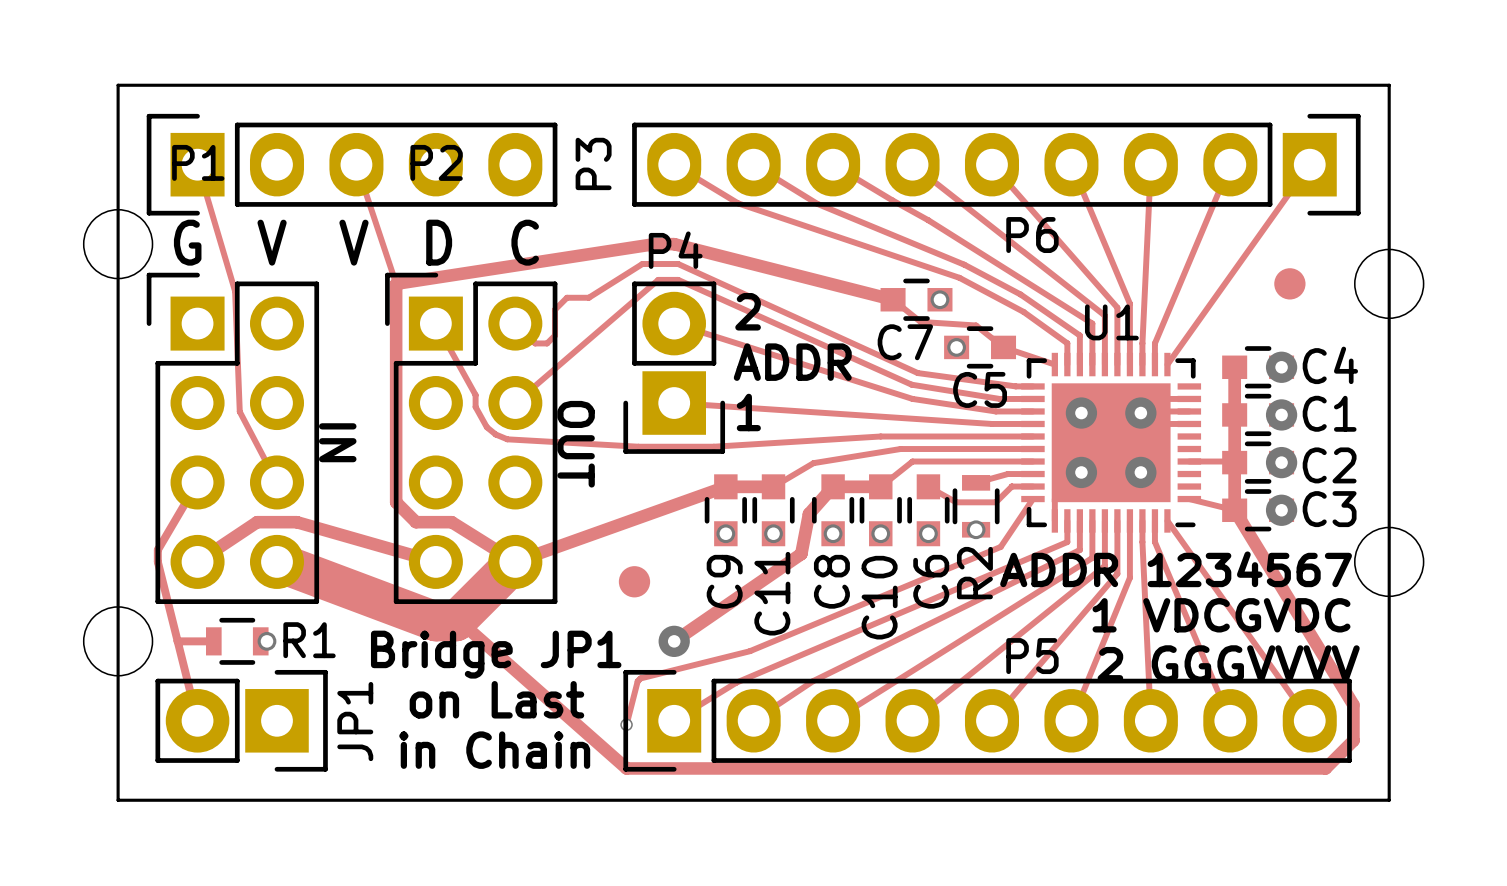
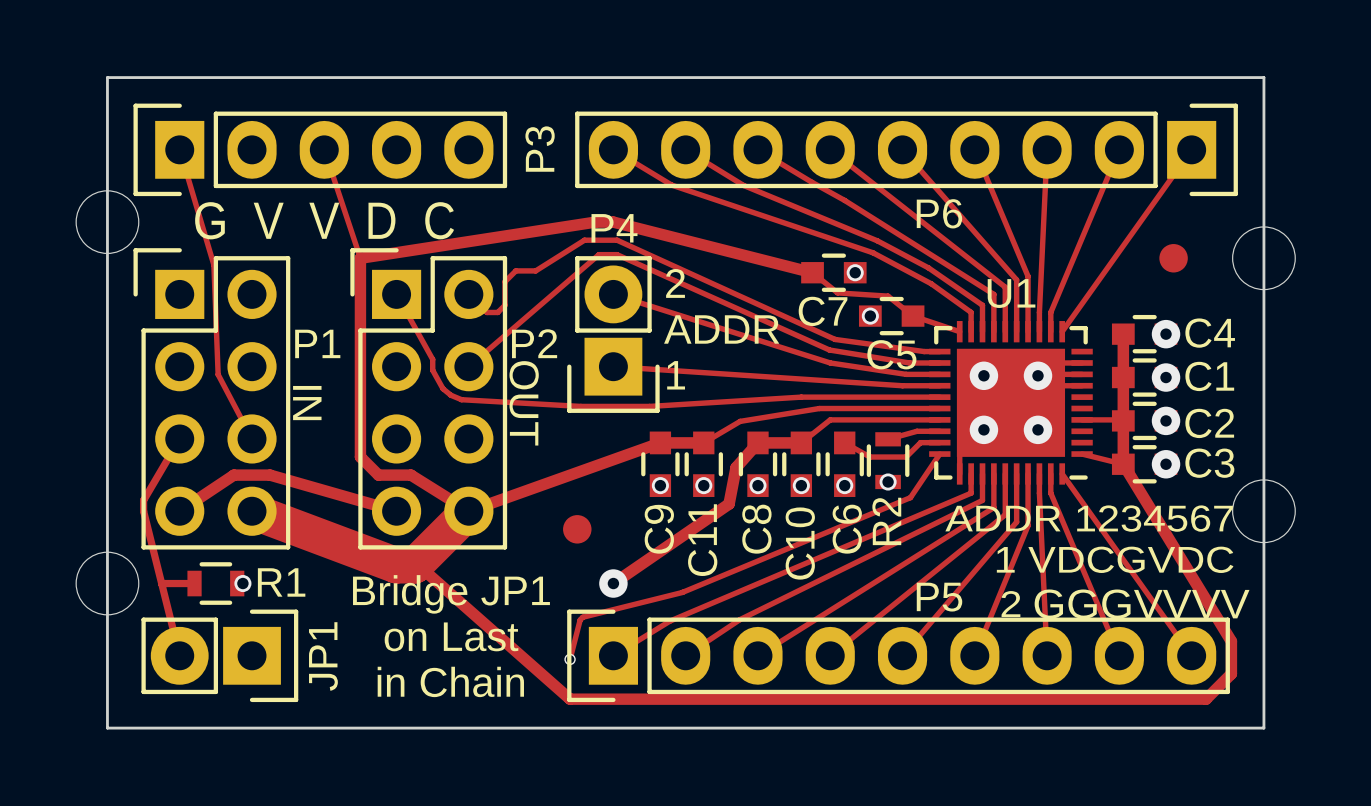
P1 name position: P1 (198, 162) -> P1 (317, 343)
P2 name position: P2 (436, 162) -> P2 (534, 343)

